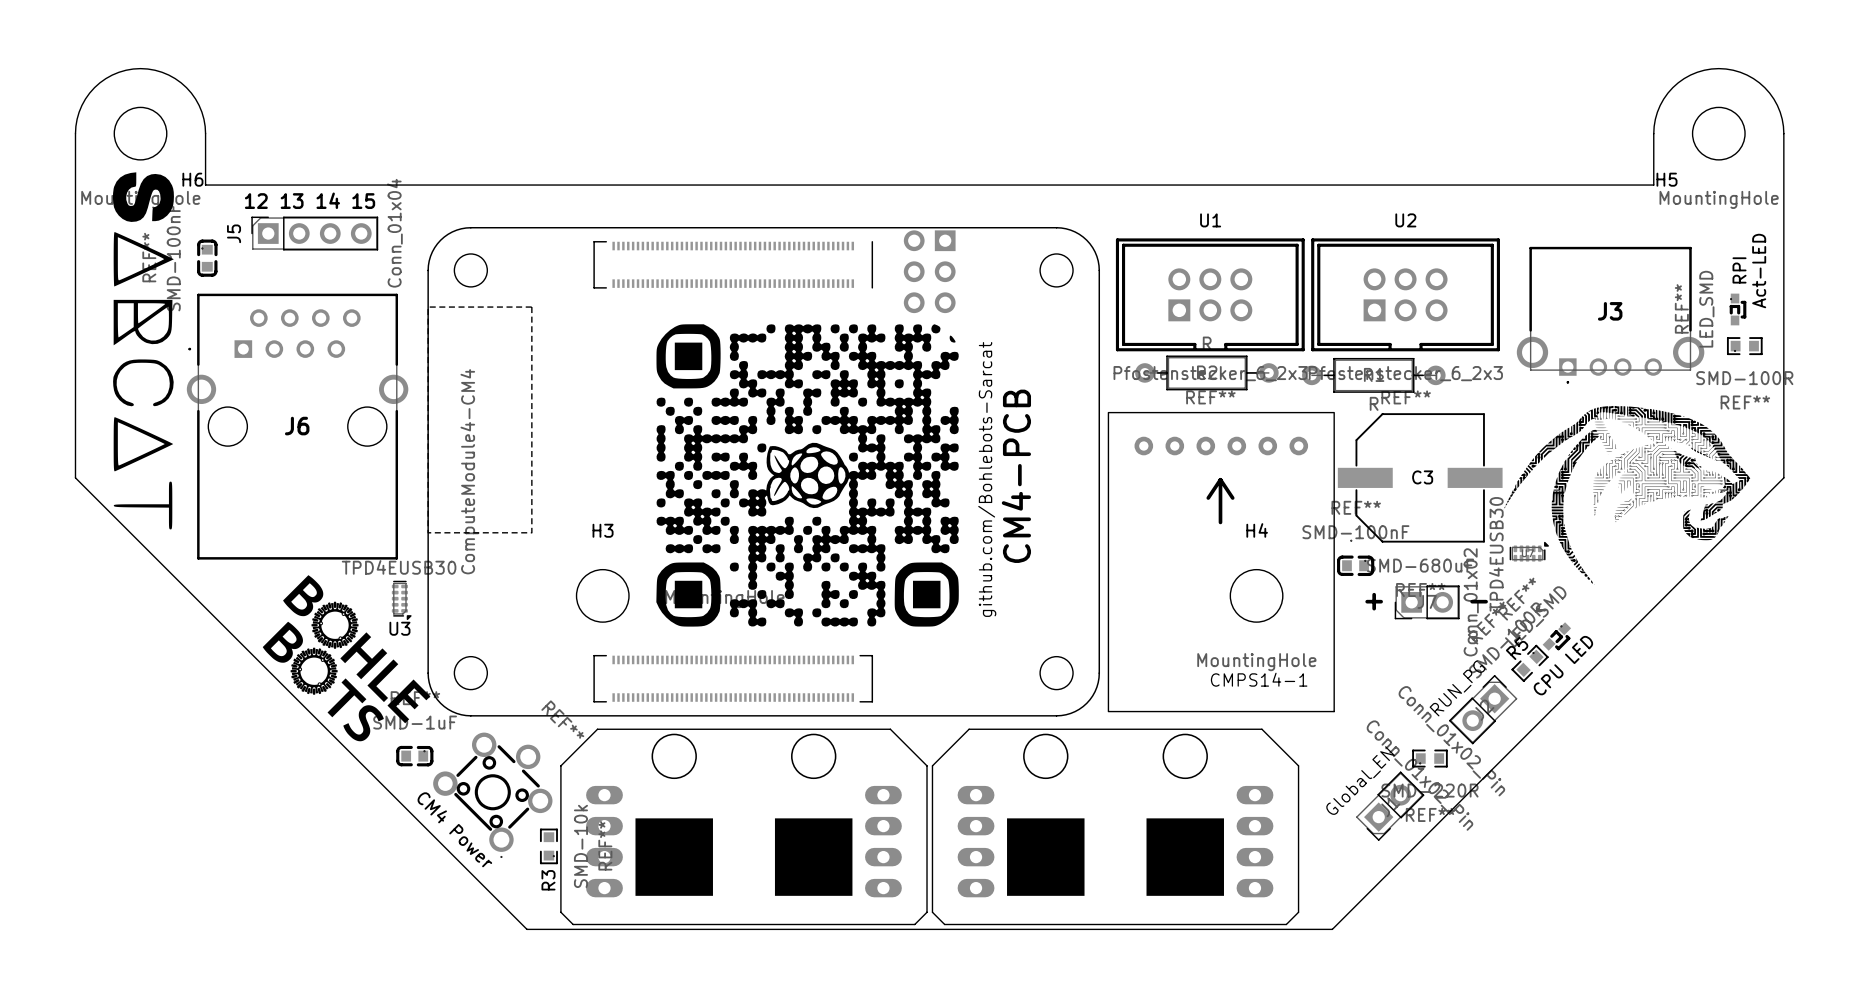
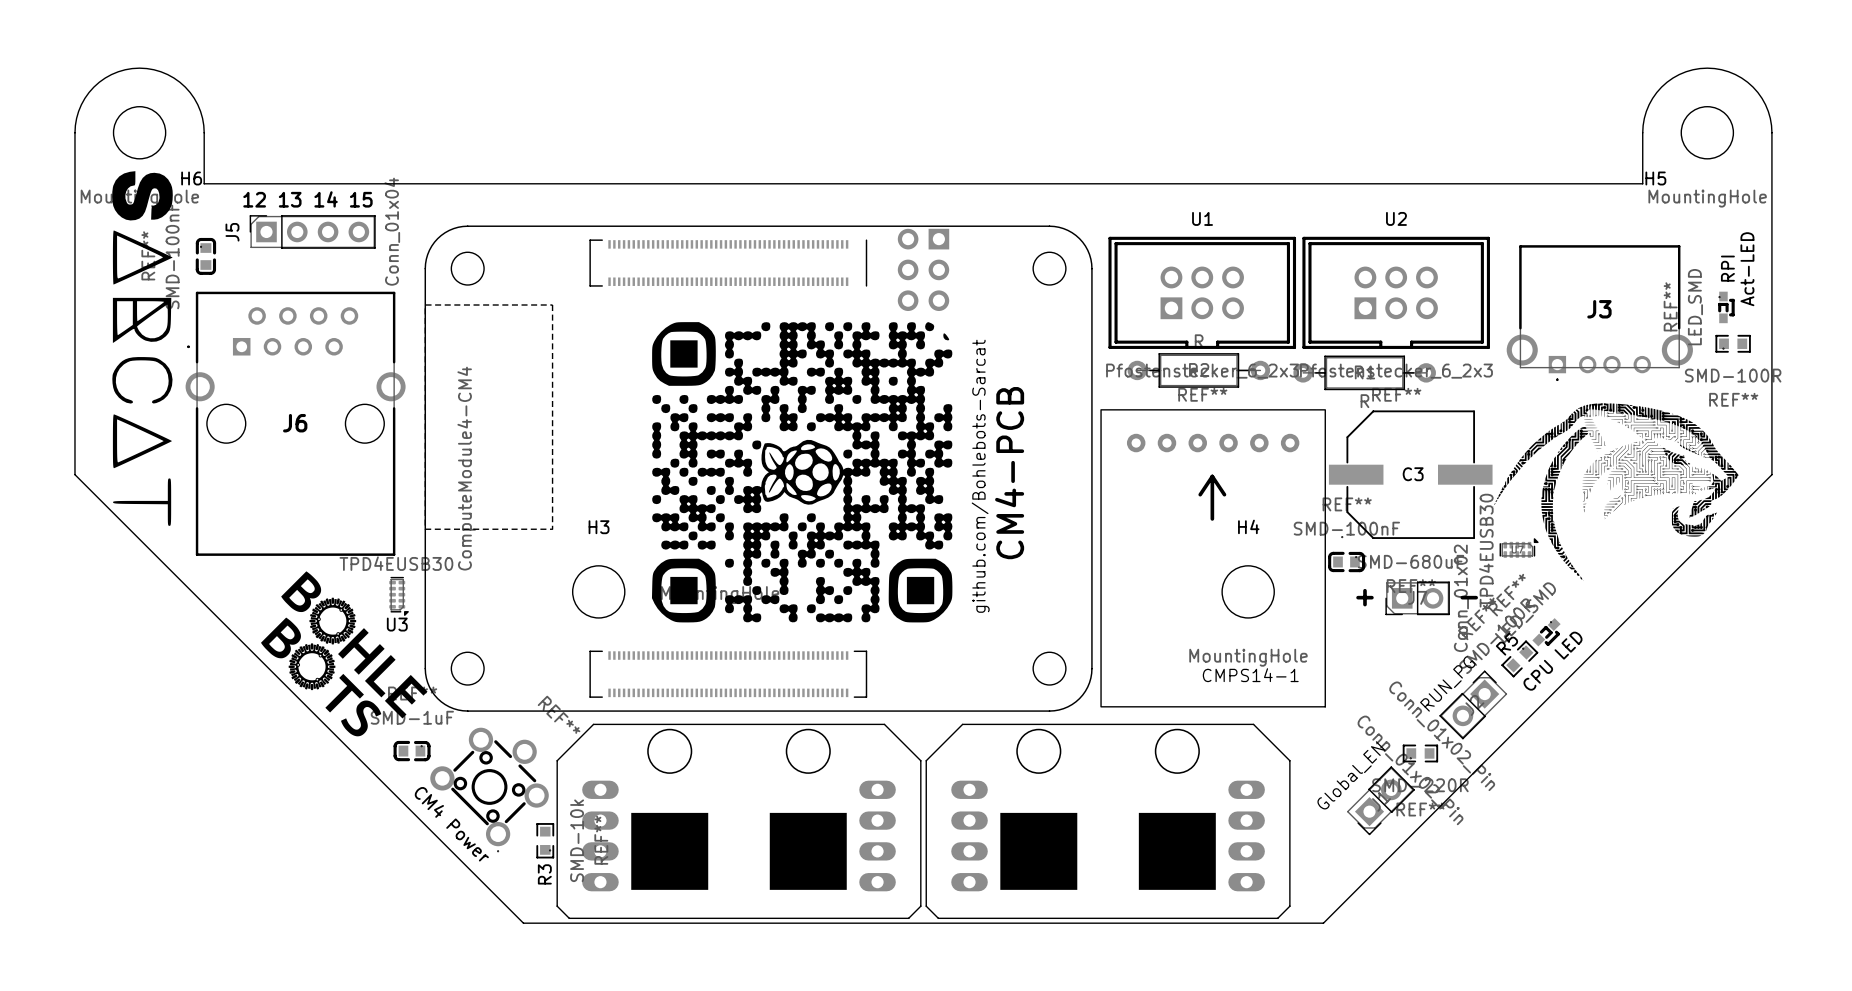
part footprint: [427, 227, 1101, 717] -> [424, 225, 1093, 712]

